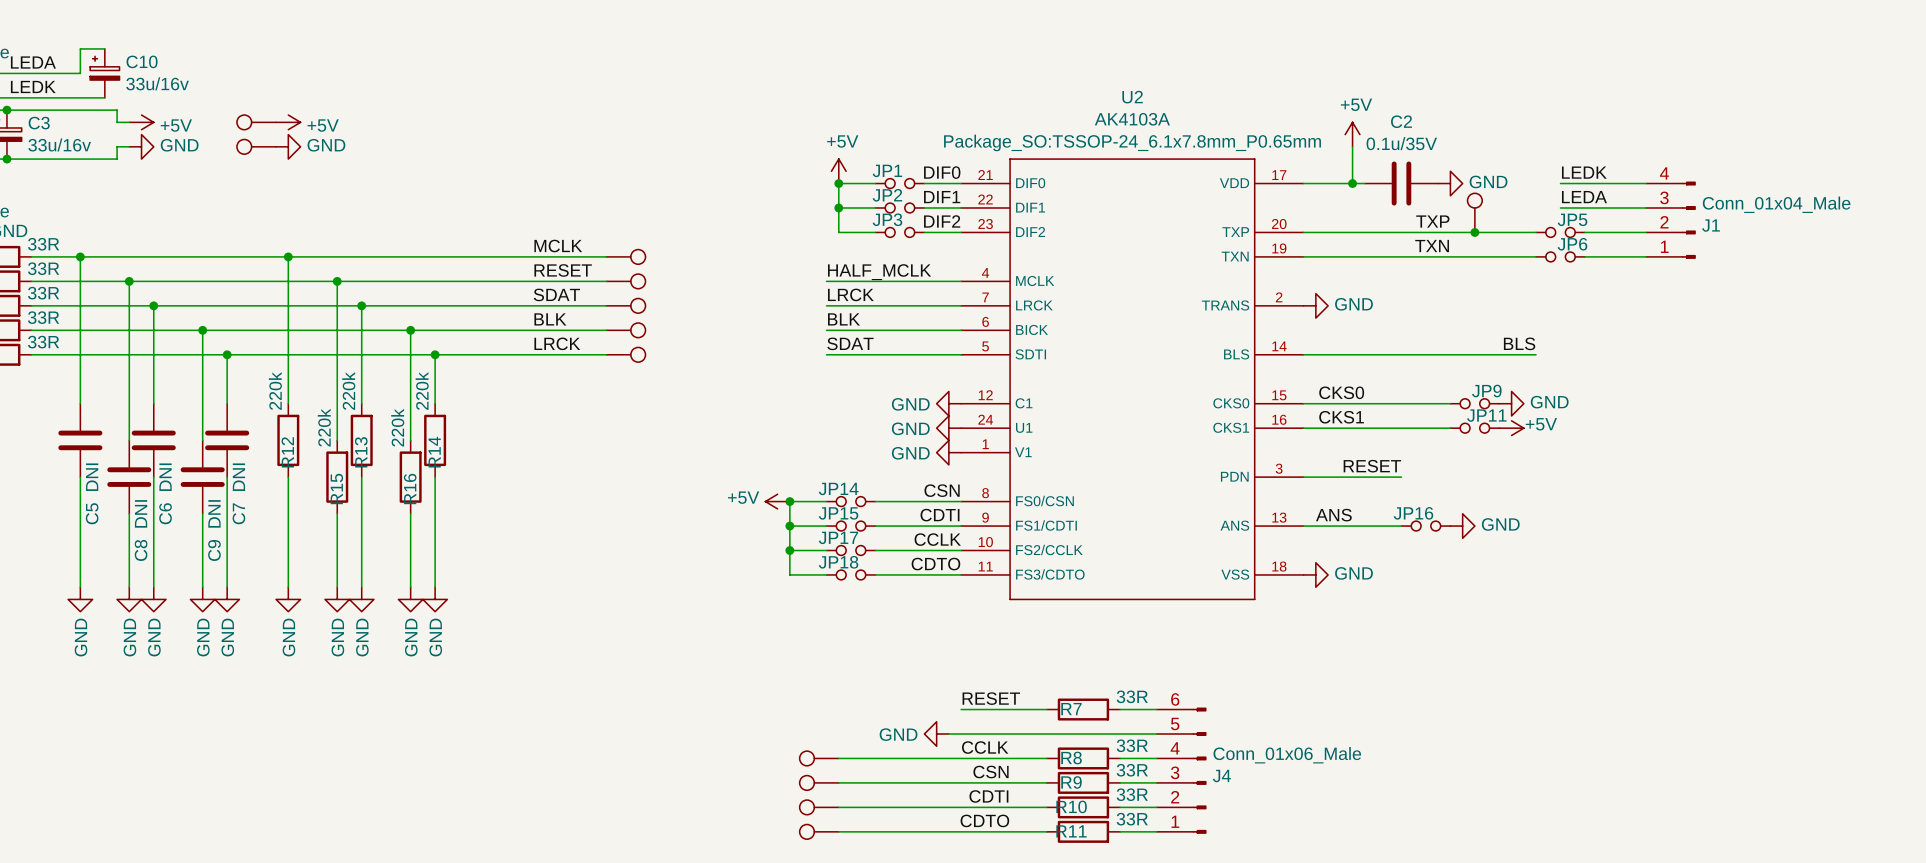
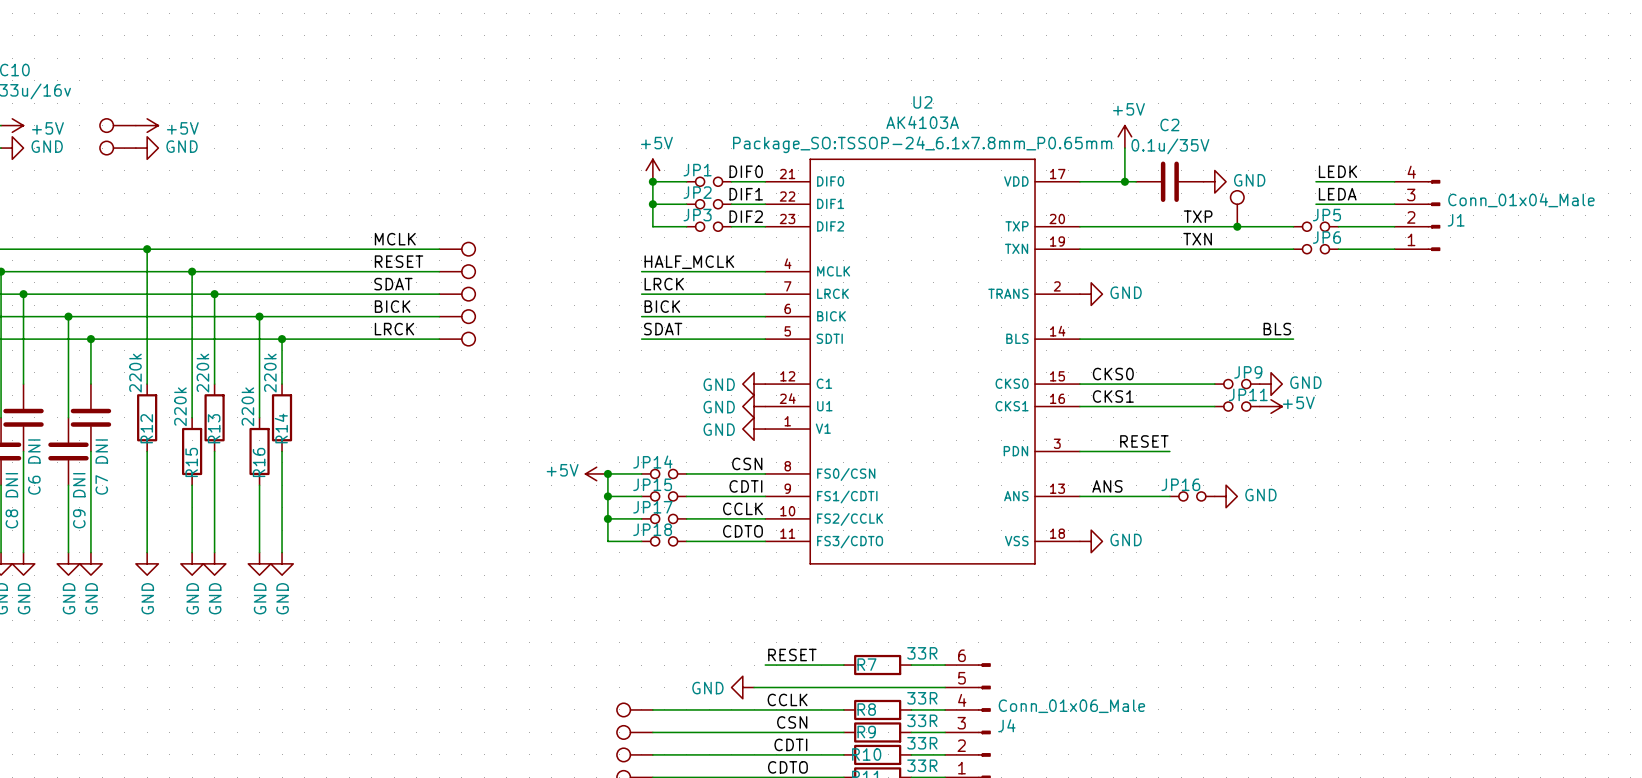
label: BLK (550, 319) -> BICK (392, 306)
label: BLK (843, 319) -> BICK (662, 306)

